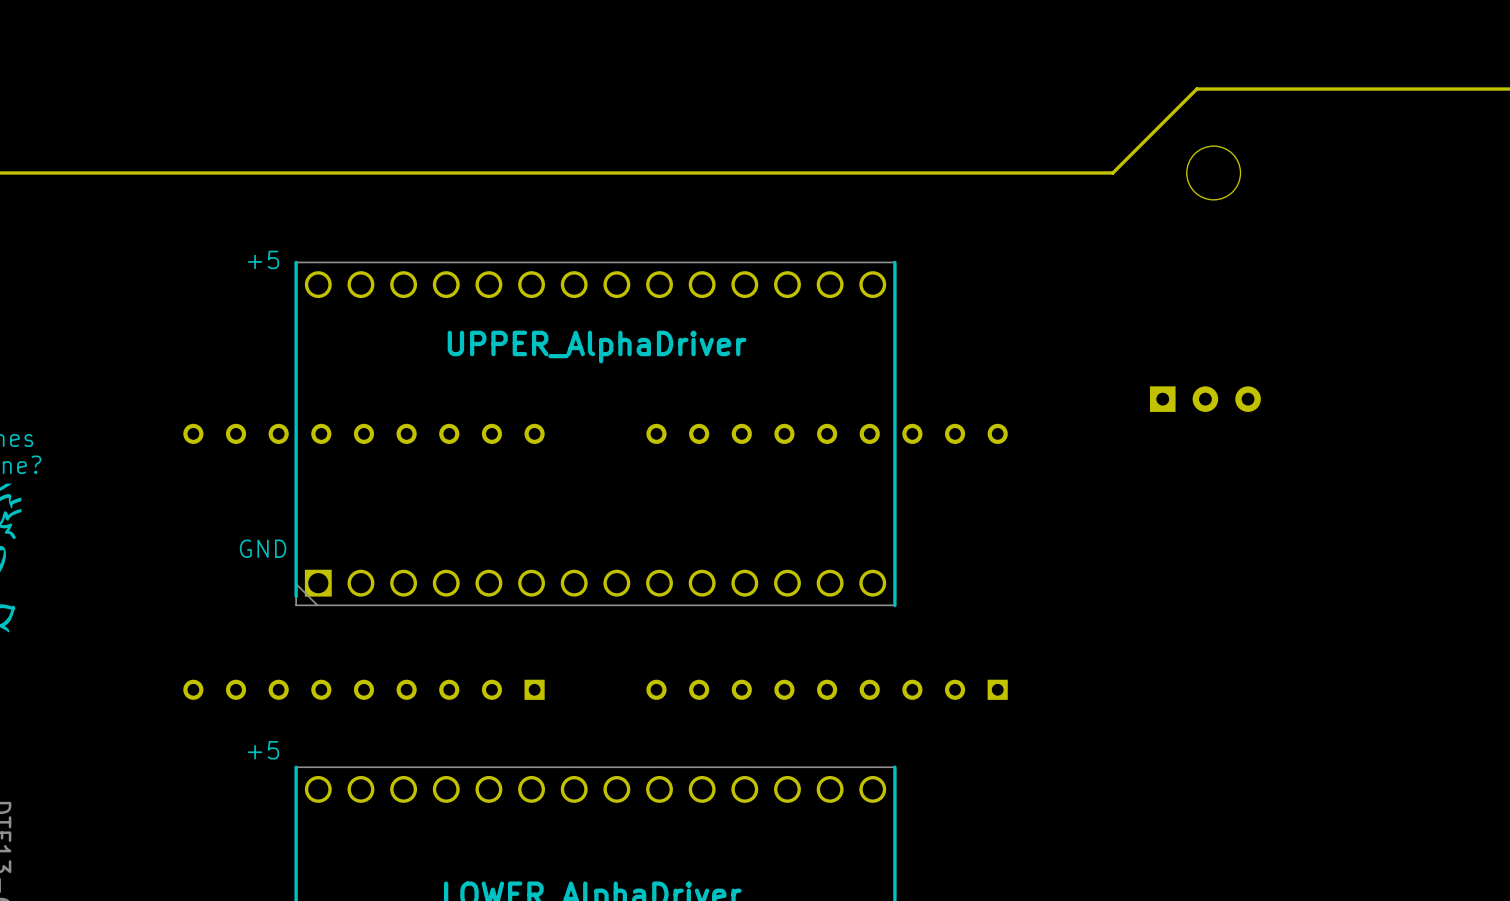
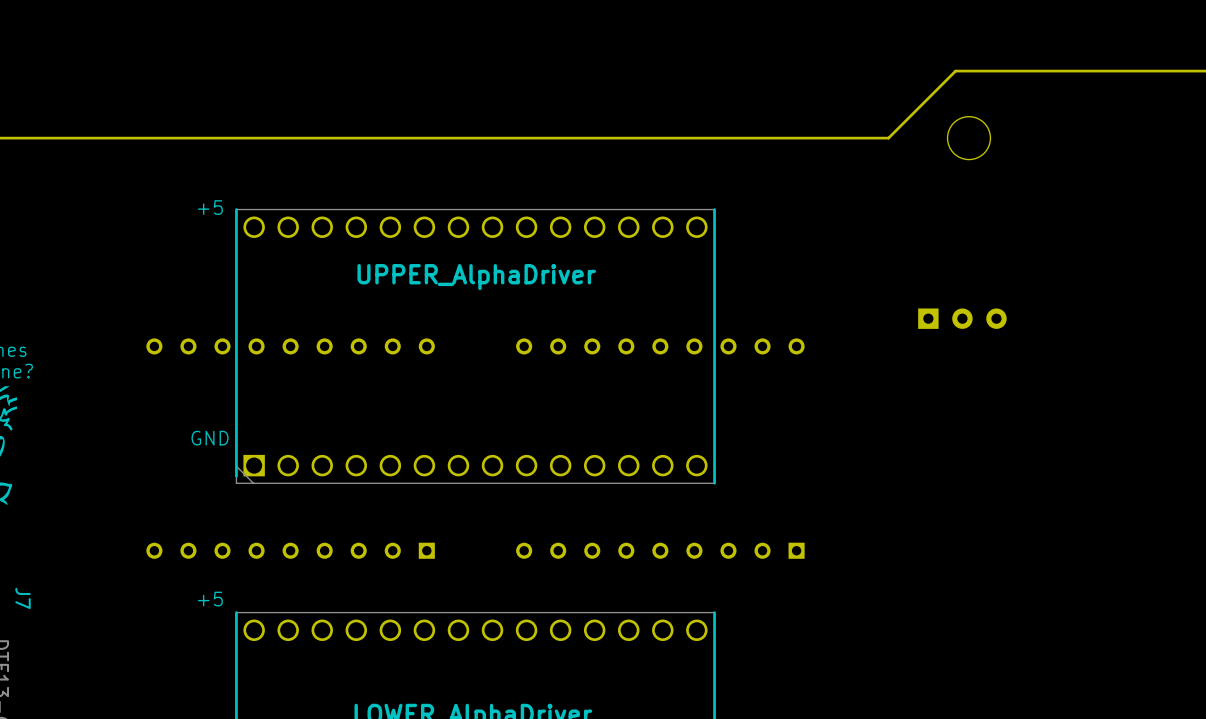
J7 name: none -> J7 (23, 598)

